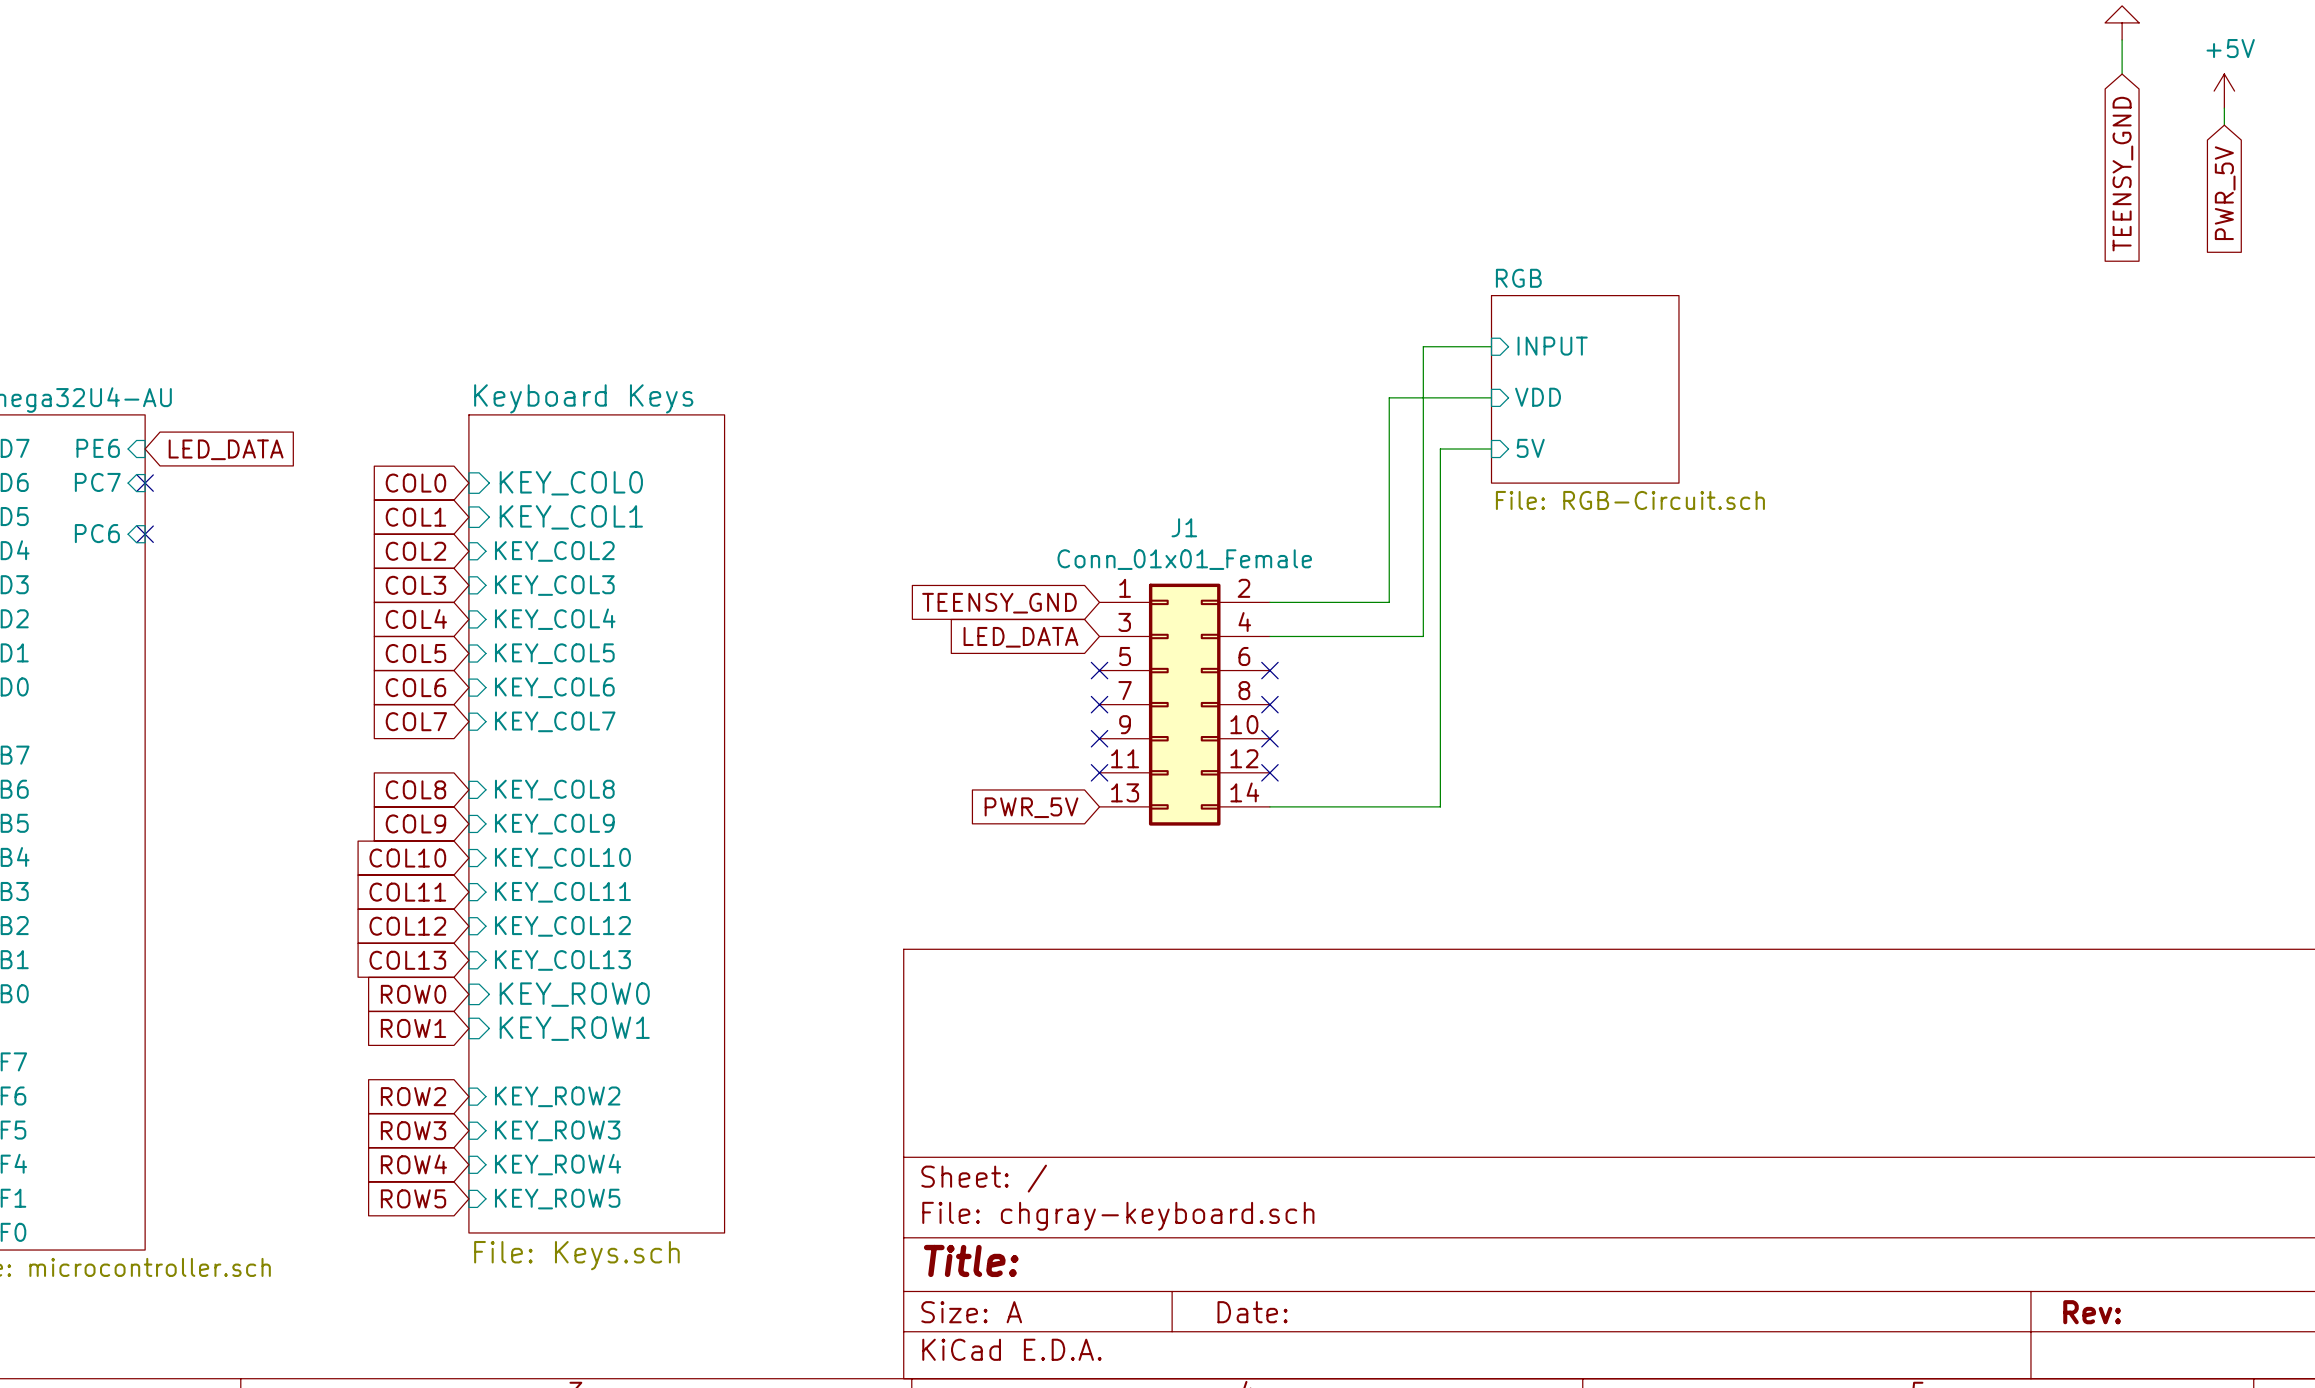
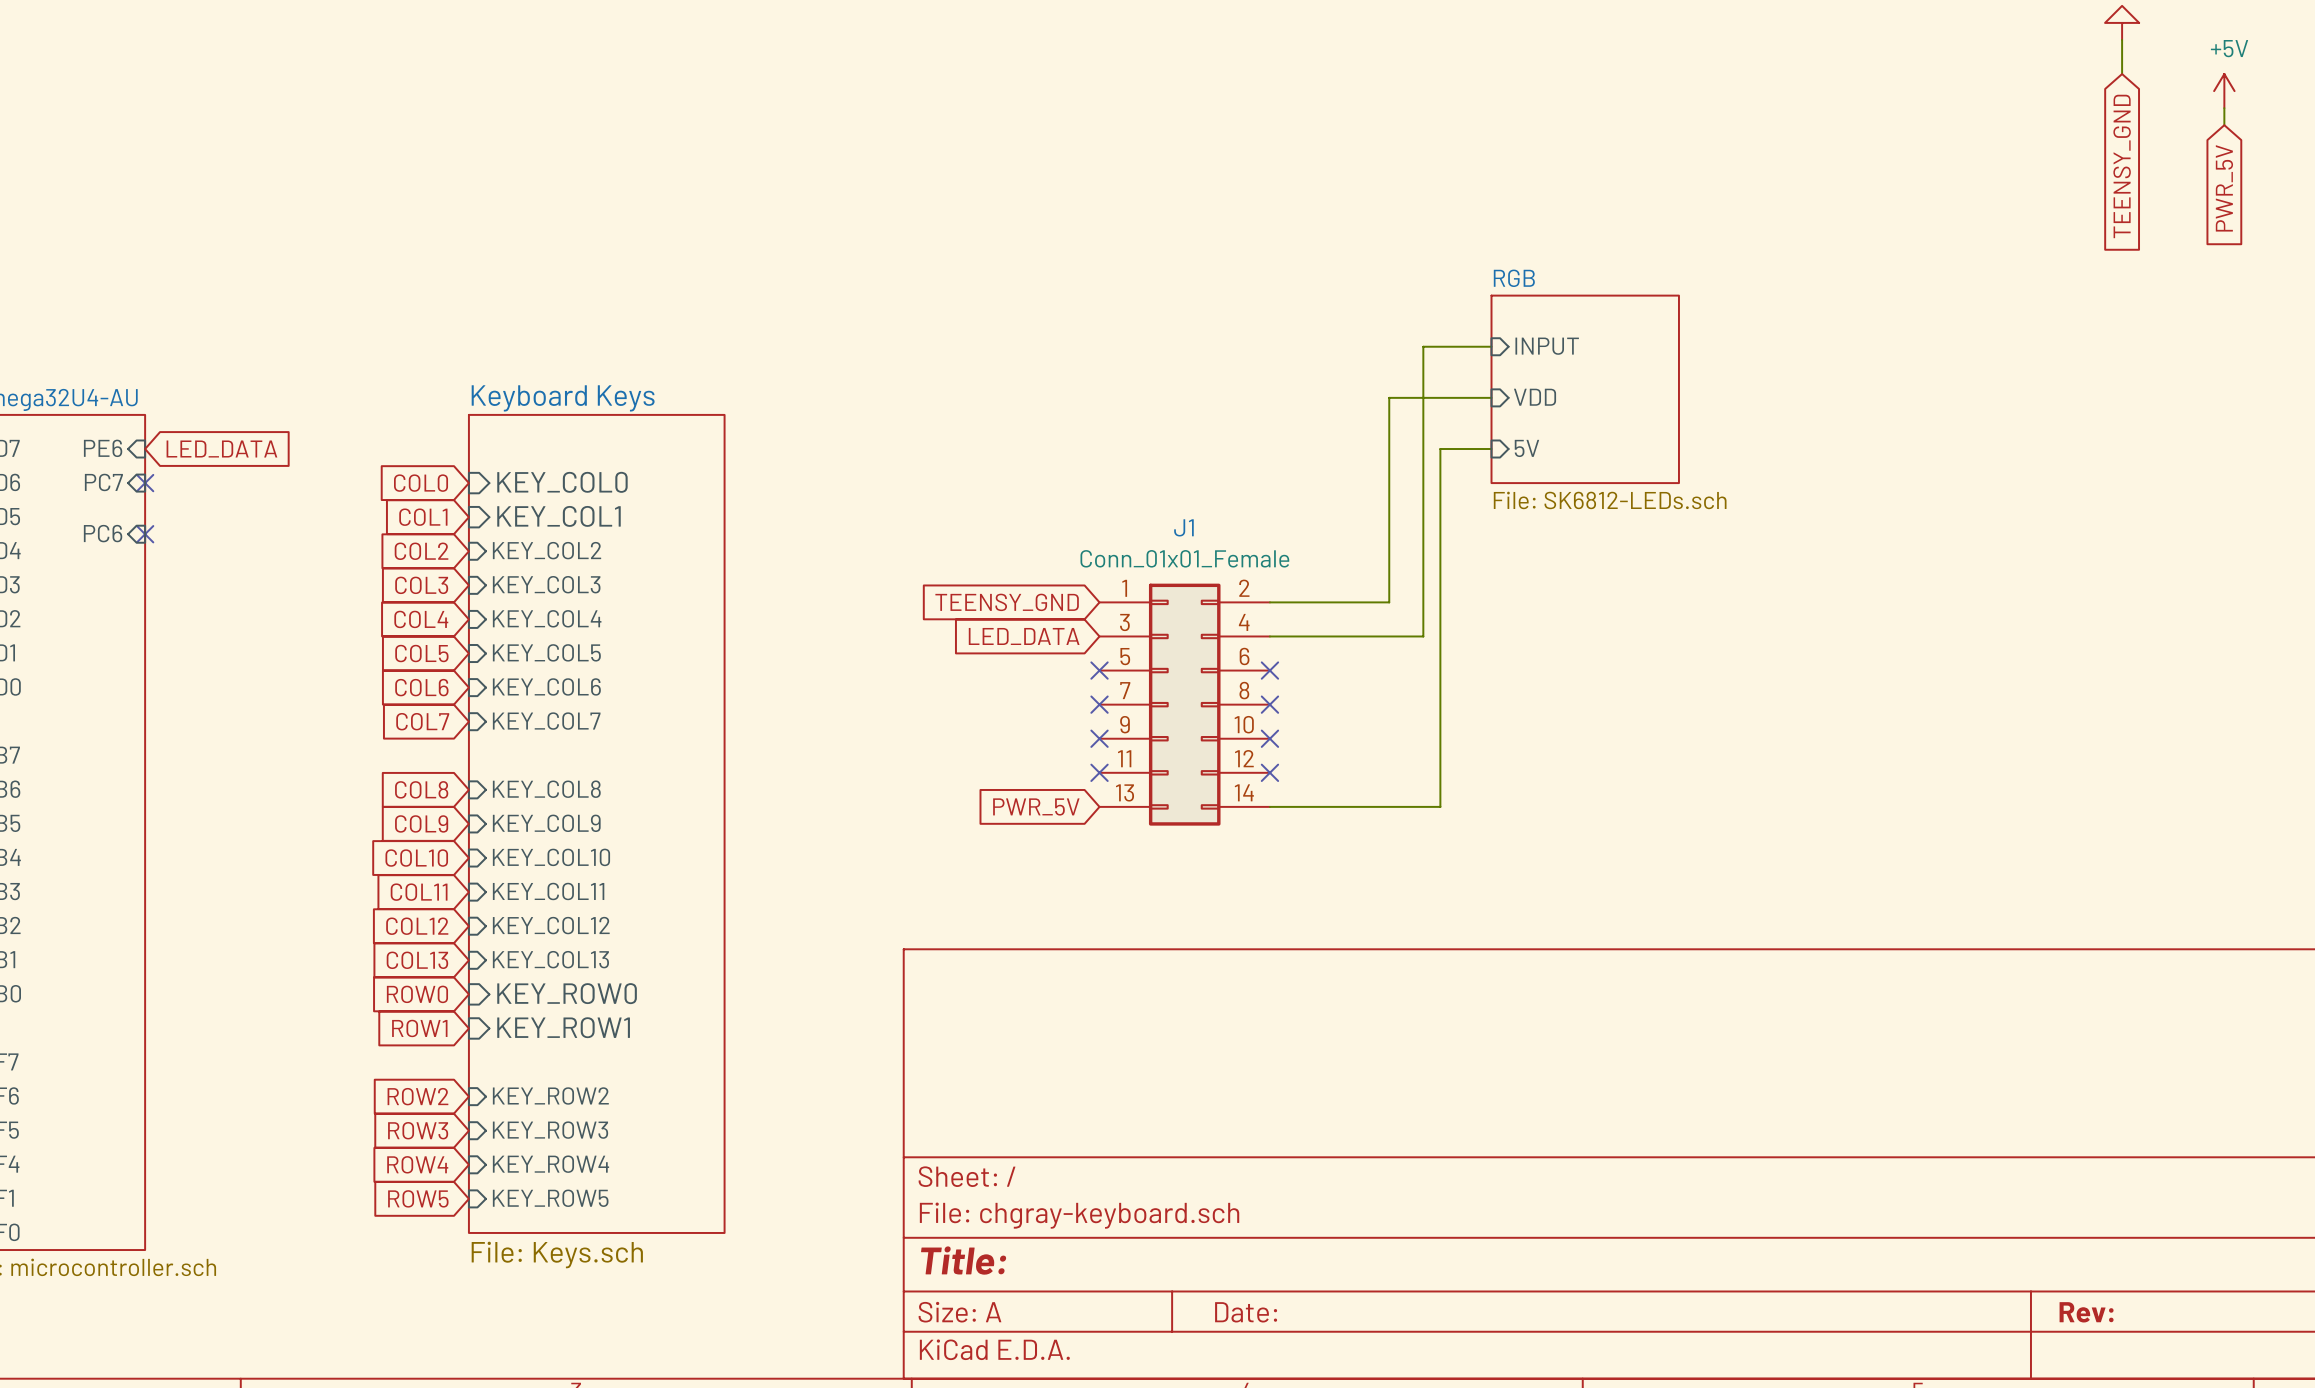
sheet RGB value: File: RGB-Circuit.sch (1630, 500) -> File: SK6812-LEDs.sch (1610, 500)

